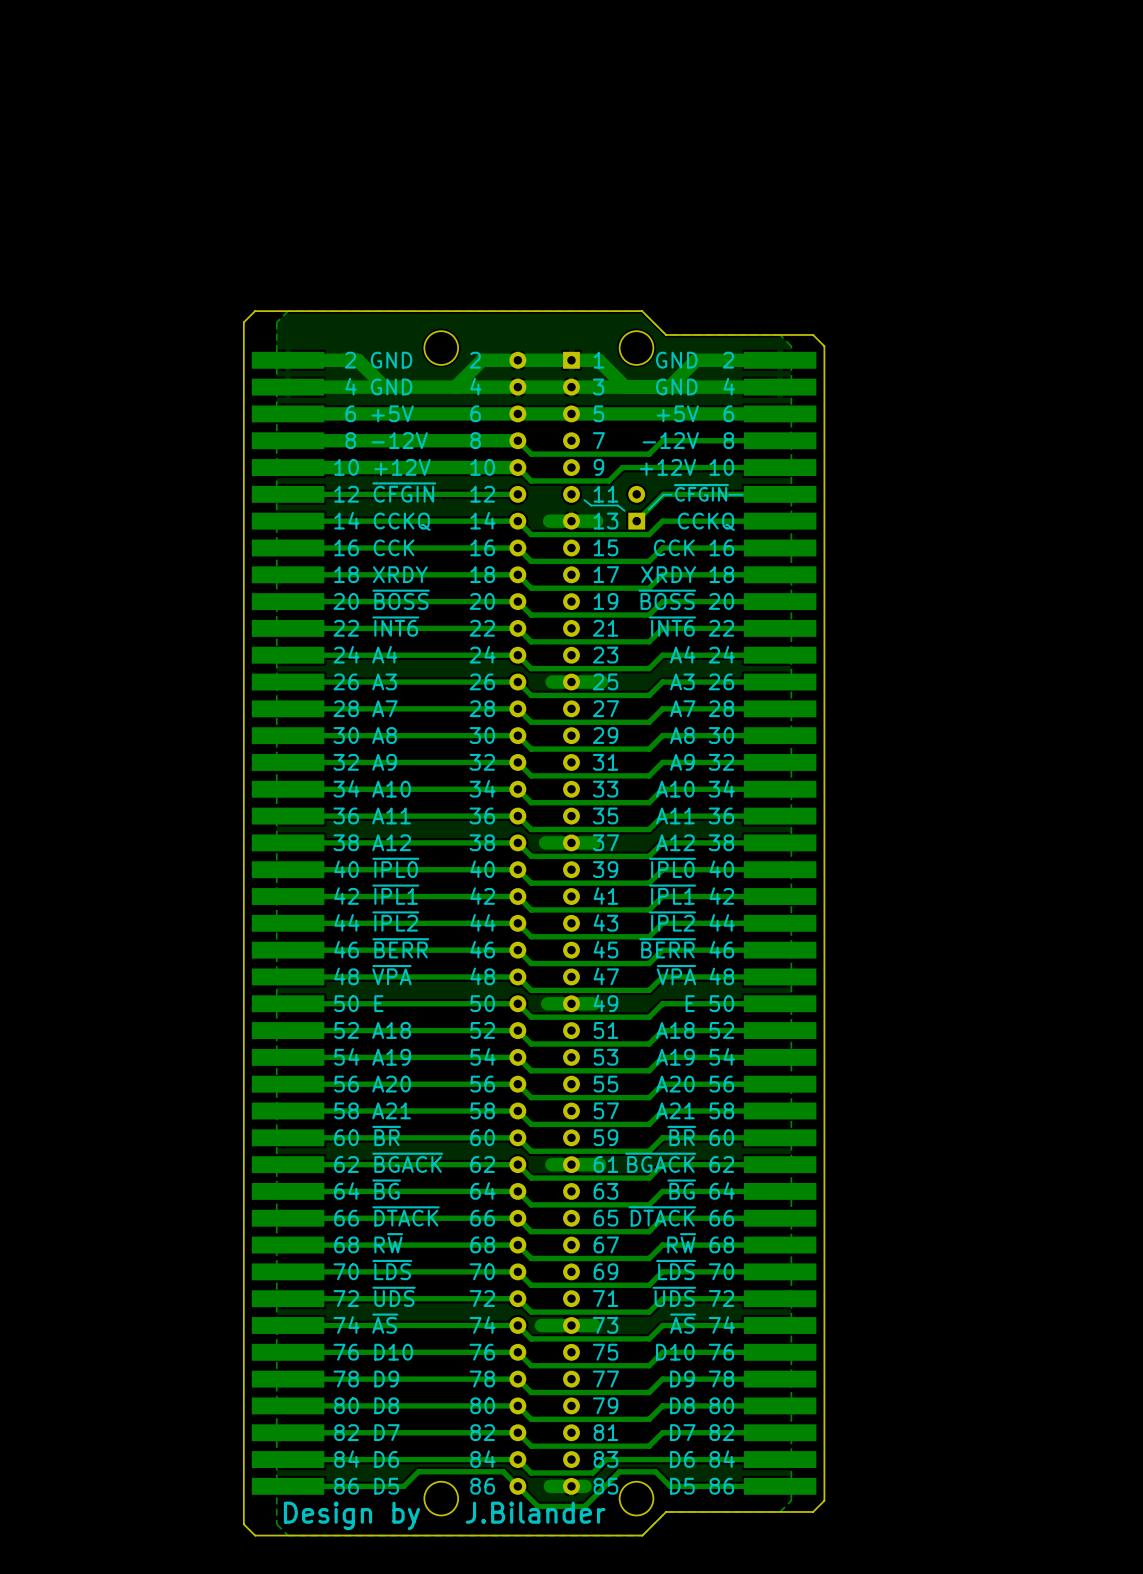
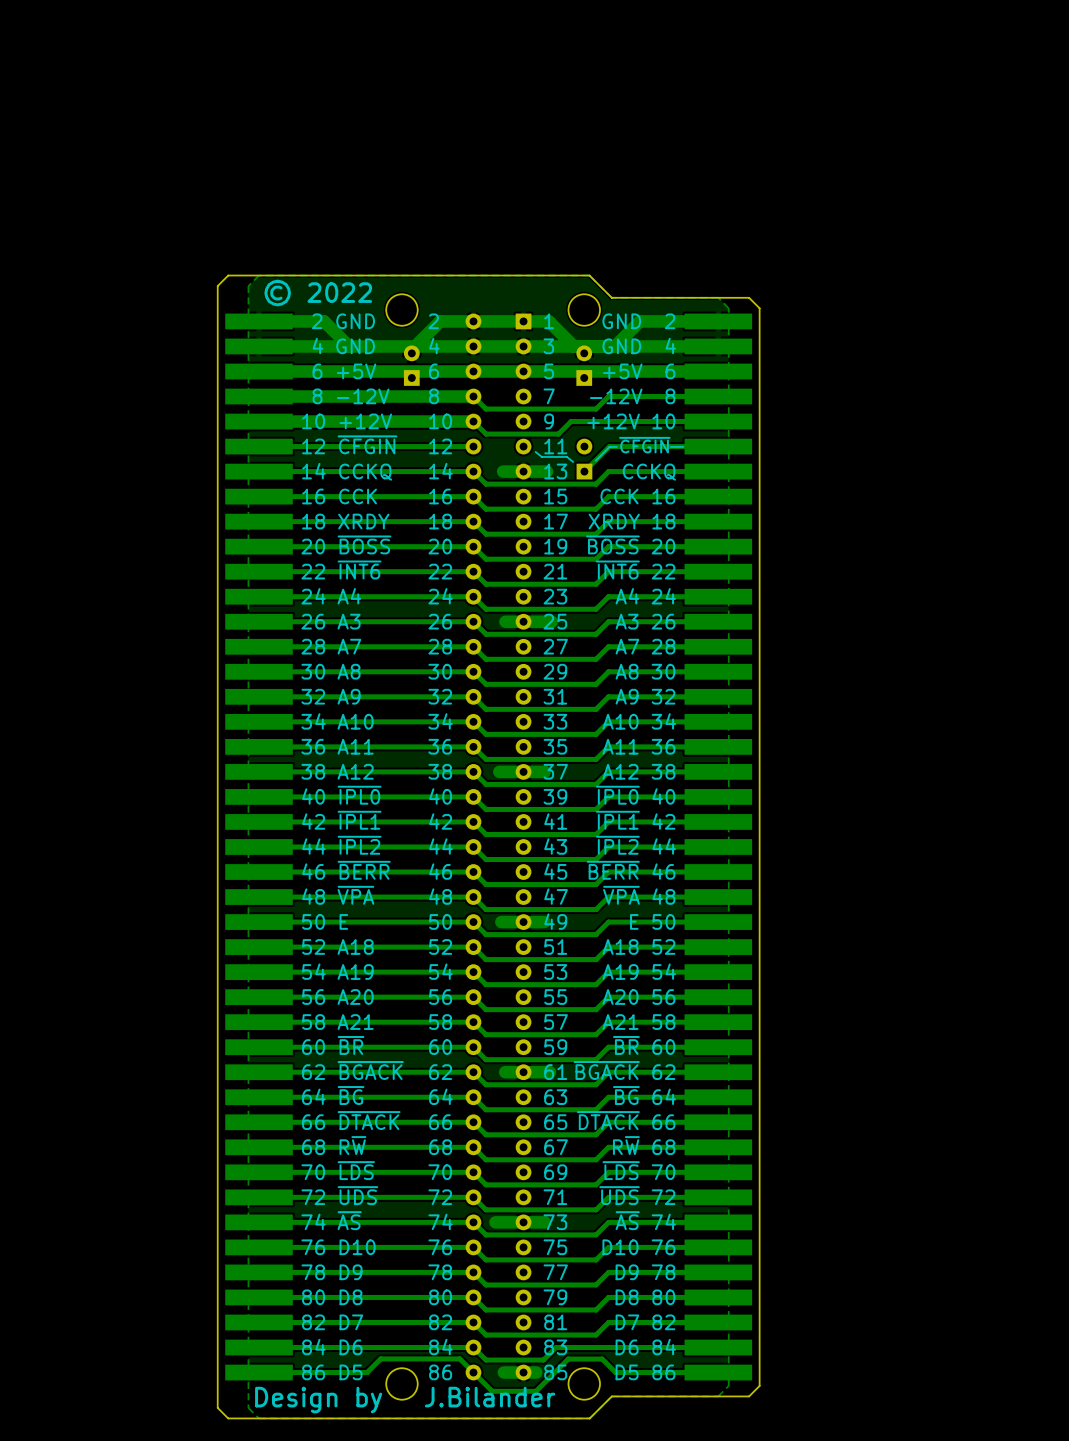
text: none -> © 2022 (318, 293)
part: none -> (411, 365)
part: none -> (584, 365)

